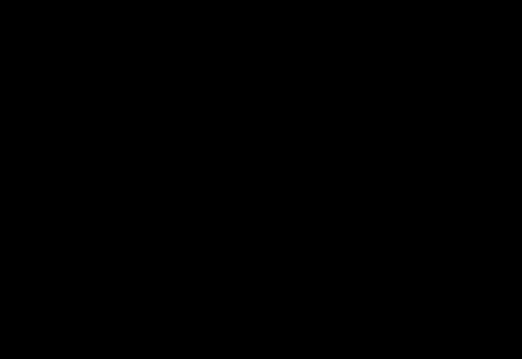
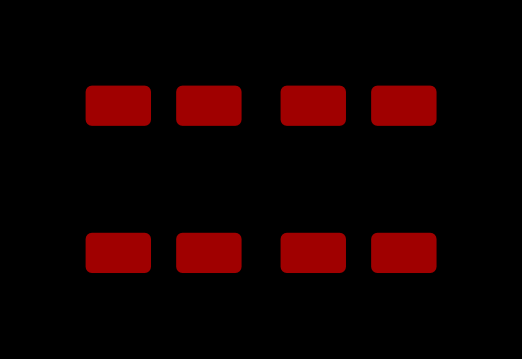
part: none -> (163, 105)
part: none -> (358, 105)
part: none -> (163, 252)
part: none -> (358, 252)

